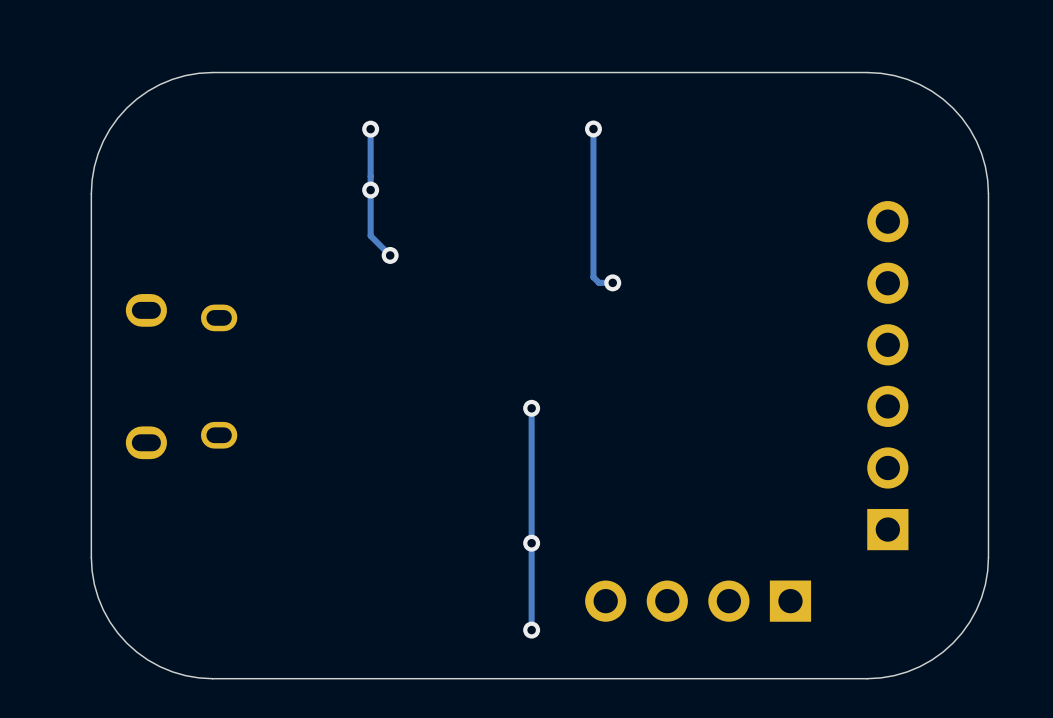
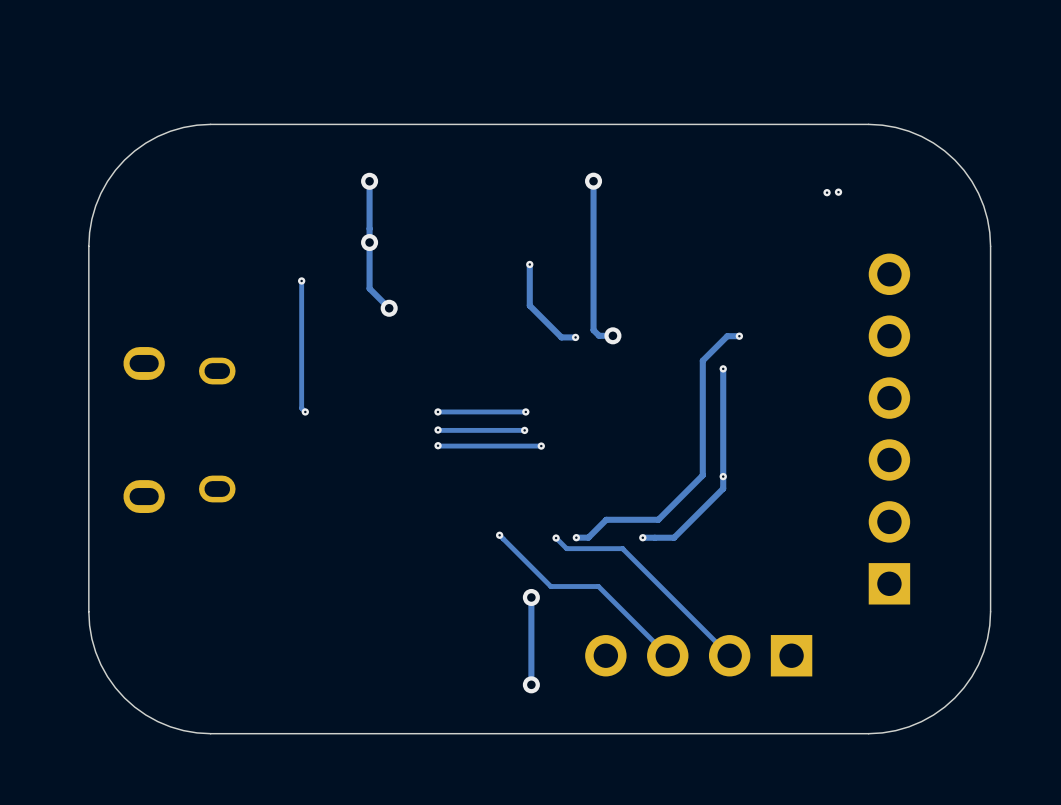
via: none -> (838, 192)
via: none -> (827, 192)
track: none -> (529, 264) (529, 305) (561, 337) (575, 337)
via: none -> (529, 264)
track: none -> (301, 280) (301, 408) (305, 411)
via: none -> (301, 280)
track: none -> (739, 336) (727, 336) (702, 360) (702, 475) (658, 519) (606, 519) (588, 537) (576, 537)
via: none -> (739, 336)
via: none -> (575, 337)
track: none -> (723, 368) (723, 488) (674, 537) (642, 537)
via: none -> (723, 368)
via: none -> (305, 411)
via: none -> (437, 411)
track: none -> (525, 411) (437, 411)
via: none -> (525, 411)
track: none -> (438, 430) (524, 430)
via: none -> (438, 430)
via: none -> (524, 430)
track: none -> (438, 445) (541, 446)
via: none -> (438, 445)
via: none -> (541, 446)
track: (531, 408) (531, 543) -> none
via: (531, 408) -> none
via: none -> (723, 476)
track: none -> (499, 535) (550, 586) (598, 586) (667, 655)
via: none -> (499, 535)
via: none -> (576, 537)
via: none -> (642, 537)
track: none -> (556, 538) (566, 548) (622, 548)
via: none -> (556, 538)
track: none -> (622, 548) (729, 655)

